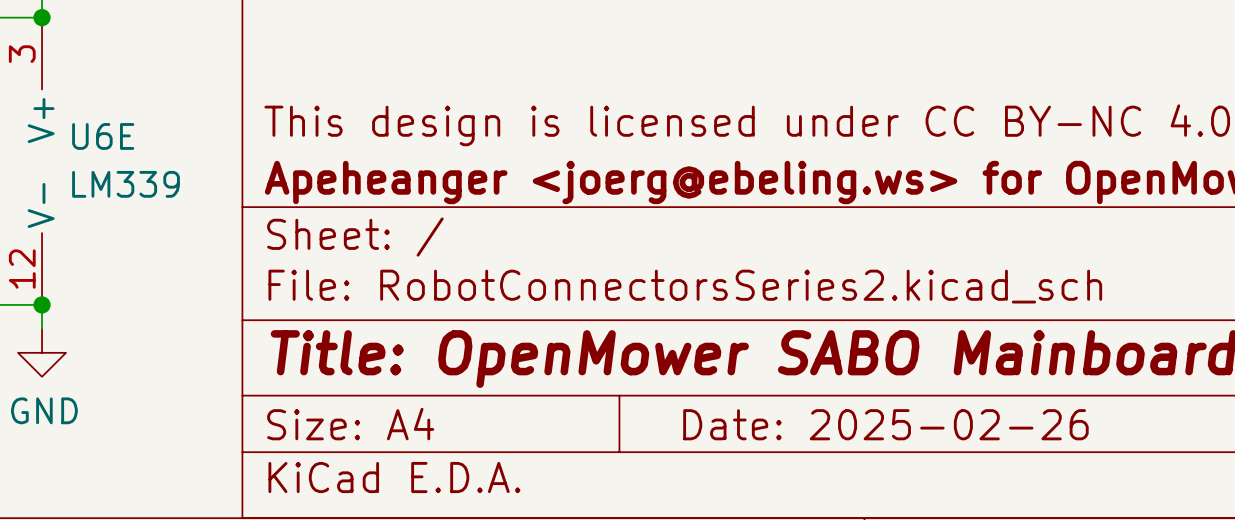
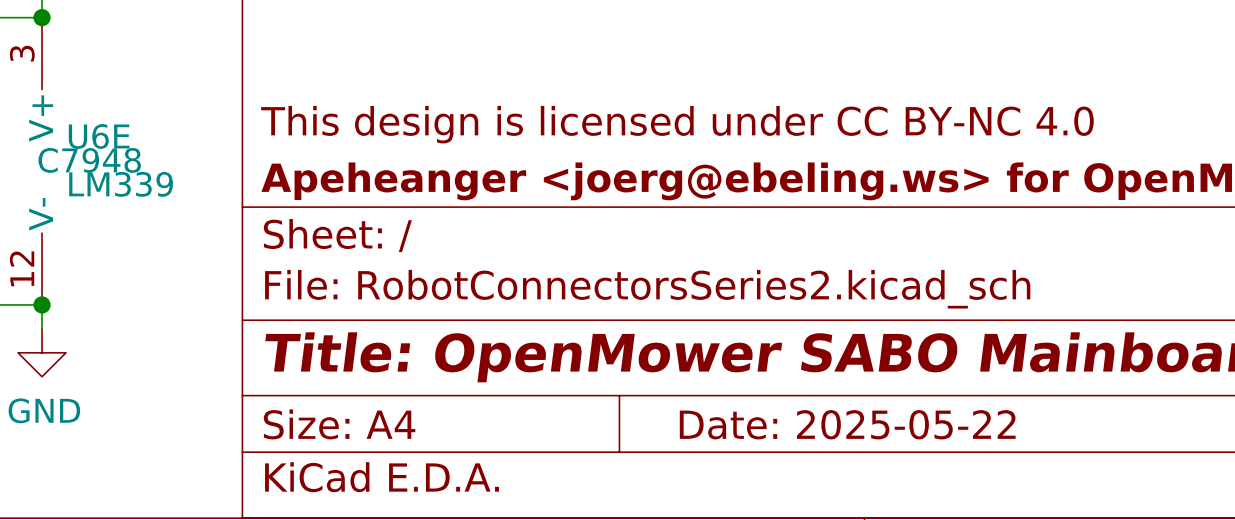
U6E text: none -> C7948 (89, 160)
title block: Date: 2025-02-26 (885, 424) -> Date: 2025-05-22 (847, 424)

